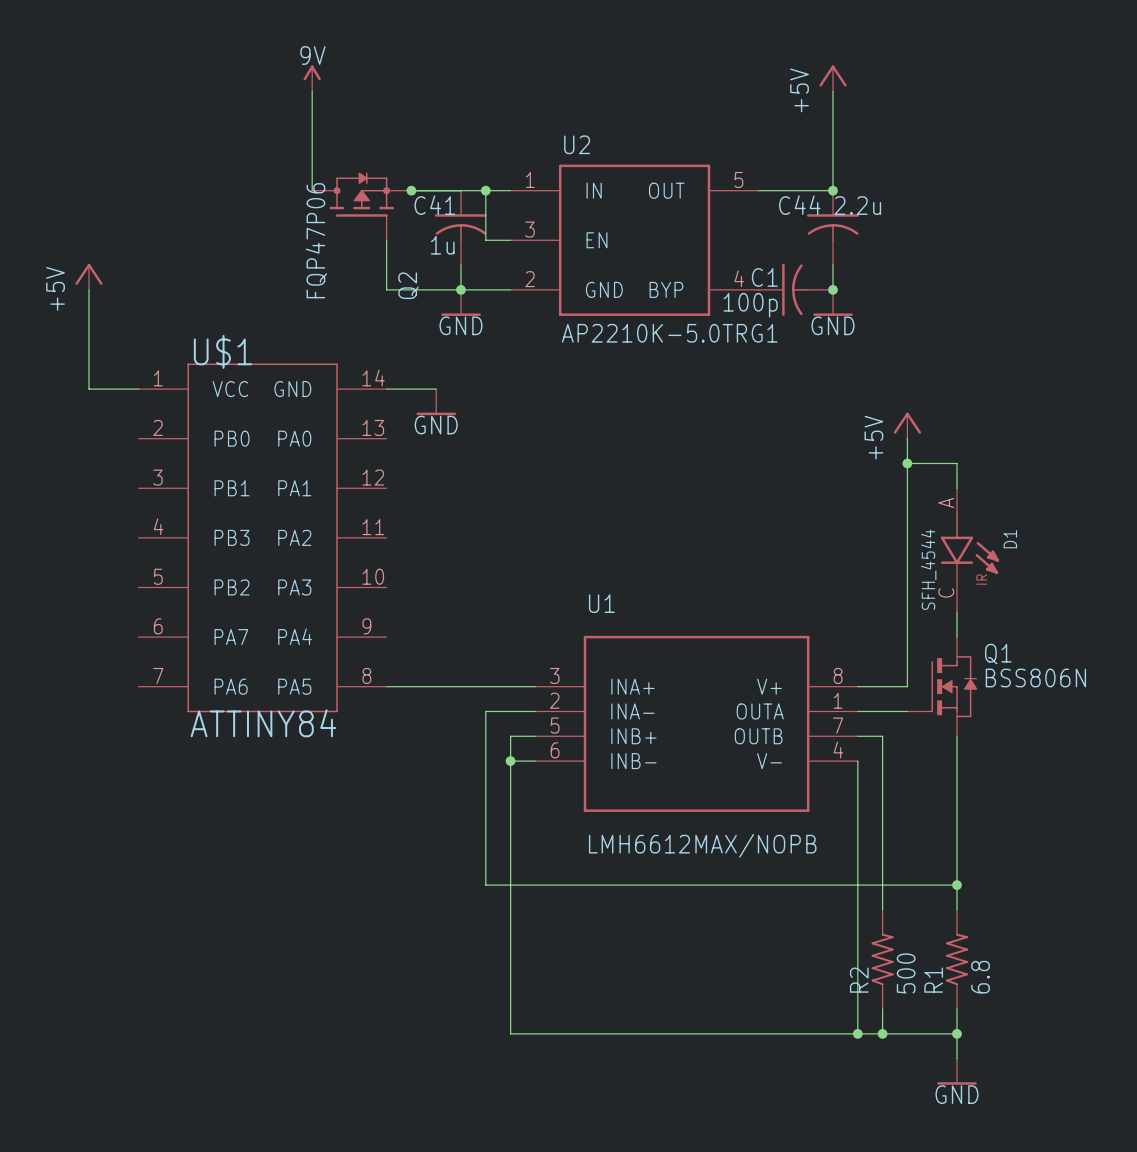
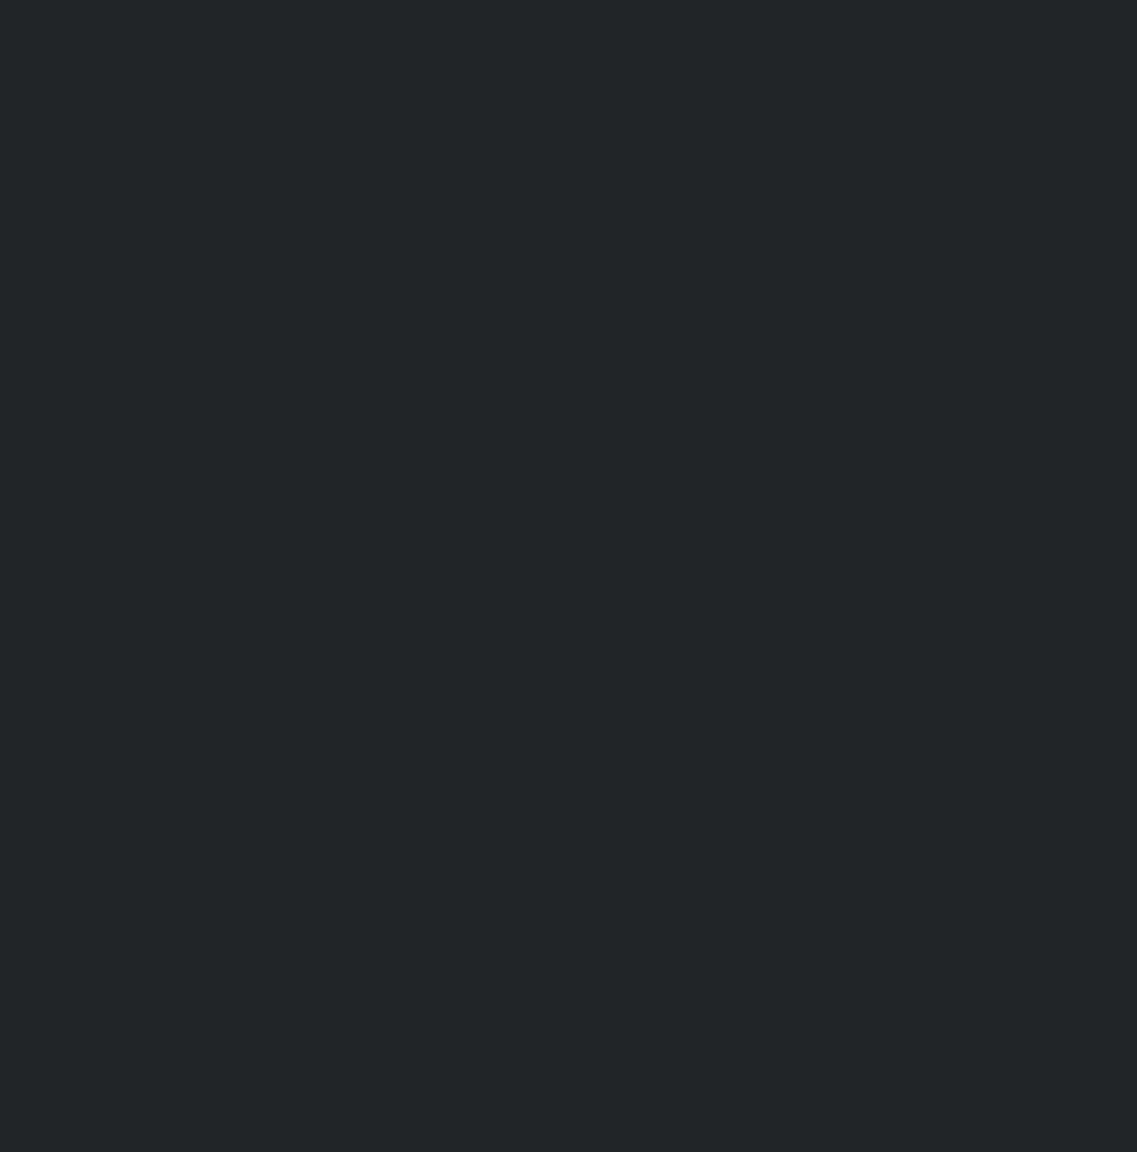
power symbol: 9V (312, 78) -> none
power symbol: +5V (832, 78) -> none
wire: (312, 91) (312, 190) -> none
wire: (832, 91) (832, 190) (758, 190) -> none
wire: (411, 190) (510, 190) -> none
junction: (411, 190) -> none
wire: (485, 190) (485, 240) (510, 240) -> none
junction: (485, 190) -> none
junction: (832, 190) -> none
Q2: FQP47P06 (361, 206) -> none
C41: 1u (461, 227) -> none
C44: 2.2u (832, 227) -> none
wire: (386, 240) (386, 289) (510, 289) -> none
U2: AP2210K-5.0TRG1 (634, 240) -> none
wire: (461, 265) (461, 289) -> none
wire: (832, 265) (832, 289) -> none
power symbol: +5V (89, 276) -> none
wire: (89, 289) (89, 389) (138, 389) -> none
junction: (461, 289) -> none
C1: 100p (795, 289) -> none
junction: (832, 289) -> none
power symbol: GND (461, 302) -> none
power symbol: GND (832, 302) -> none
wire: (386, 389) (436, 389) -> none
power symbol: GND (436, 402) -> none
power symbol: +5V (907, 425) -> none
wire: (907, 438) (907, 686) (857, 686) -> none
wire: (907, 463) (956, 463) (956, 488) -> none
junction: (907, 463) -> none
U$1: ATTINY84 (262, 537) -> none
D1: SFH_4544 (969, 550) -> none
wire: (956, 612) (956, 637) -> none
wire: (386, 686) (535, 686) -> none
Q1: BSS806N (942, 686) -> none
wire: (535, 711) (485, 711) (485, 885) (956, 885) -> none
wire: (857, 711) (907, 711) -> none
U1: LMH6612MAX/NOPB (696, 723) -> none
wire: (535, 736) (510, 736) (510, 1033) (956, 1033) -> none
wire: (857, 736) (882, 736) (882, 909) -> none
wire: (956, 736) (956, 909) -> none
wire: (510, 761) (535, 761) -> none
junction: (510, 761) -> none
wire: (857, 761) (857, 1033) -> none
junction: (956, 885) -> none
R2: 500 (882, 959) -> none
R1: 6.8 (956, 959) -> none
wire: (882, 1009) (882, 1033) -> none
wire: (956, 1009) (956, 1058) -> none
junction: (857, 1033) -> none
junction: (882, 1033) -> none
junction: (956, 1033) -> none
power symbol: GND (956, 1071) -> none

